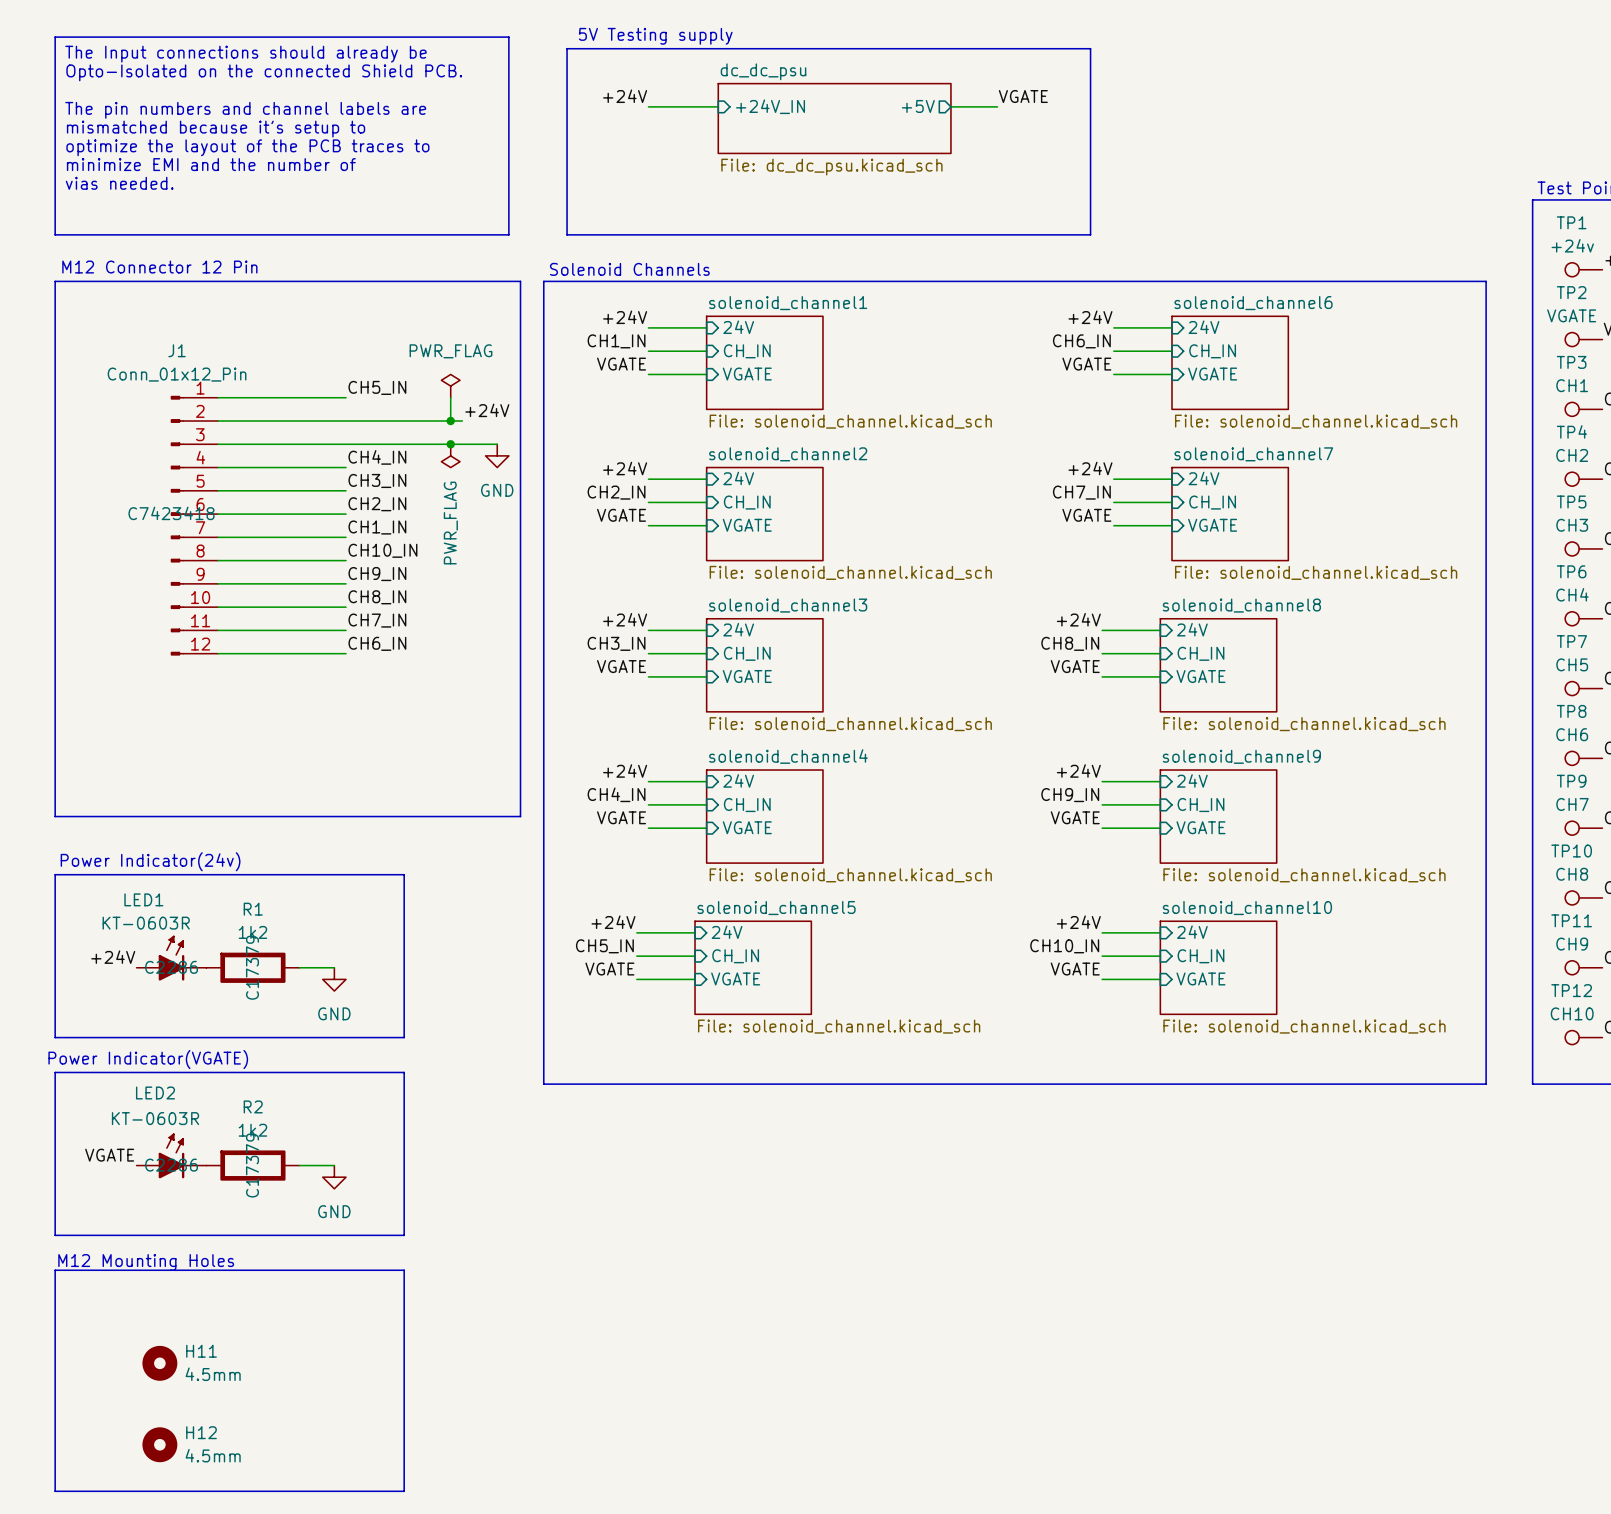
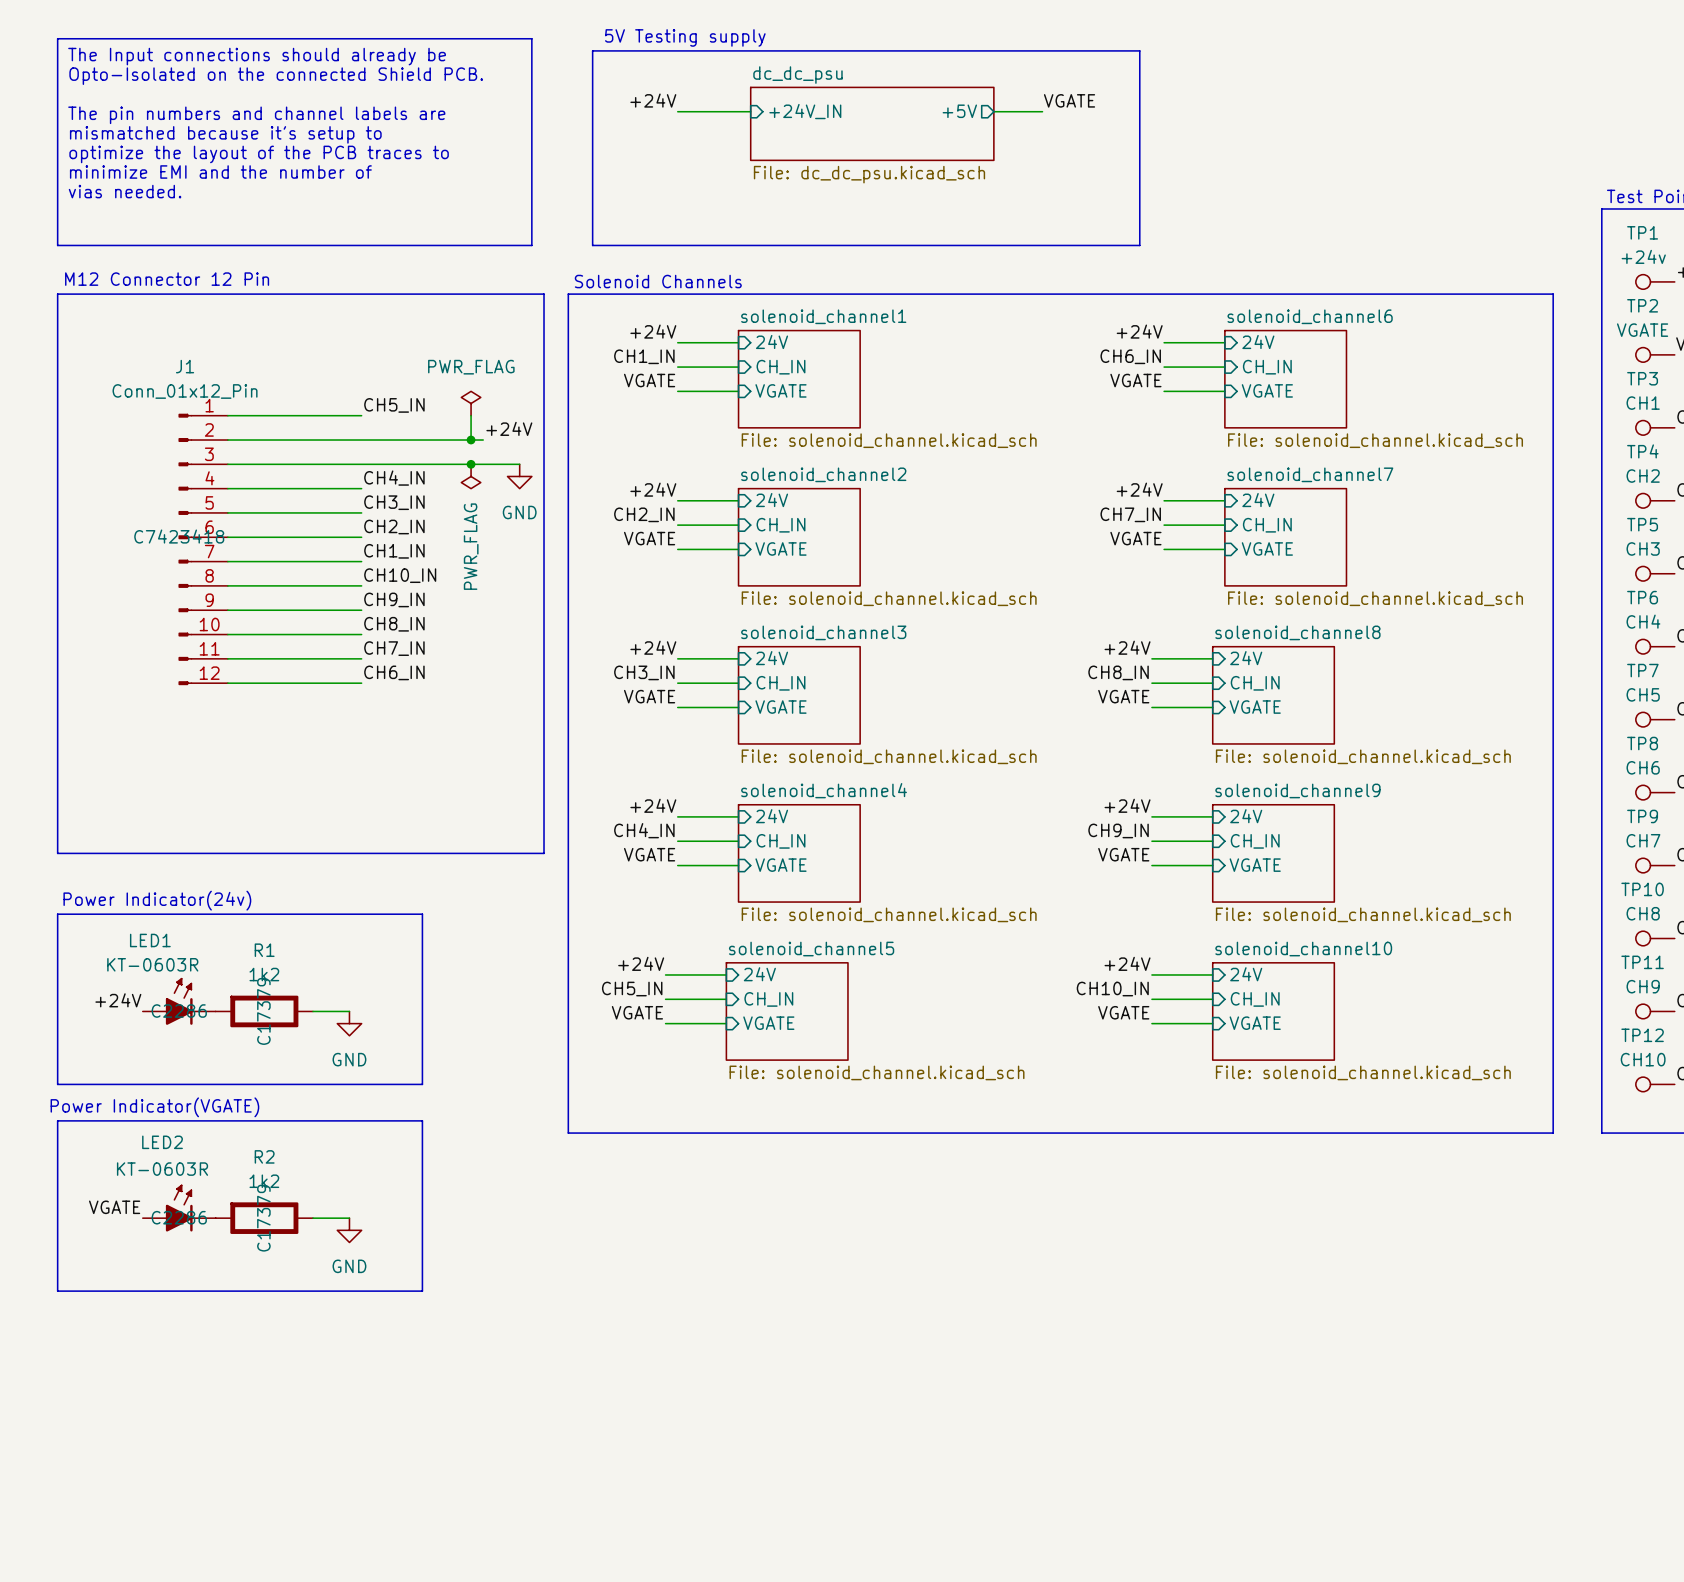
text: M12 Mounting Holes (146, 1262) -> none
line: (55, 1270) (404, 1270) (404, 1491) (55, 1491) (55, 1270) -> none
H11: 4.5mm (159, 1363) -> none
H12: 4.5mm (159, 1444) -> none

